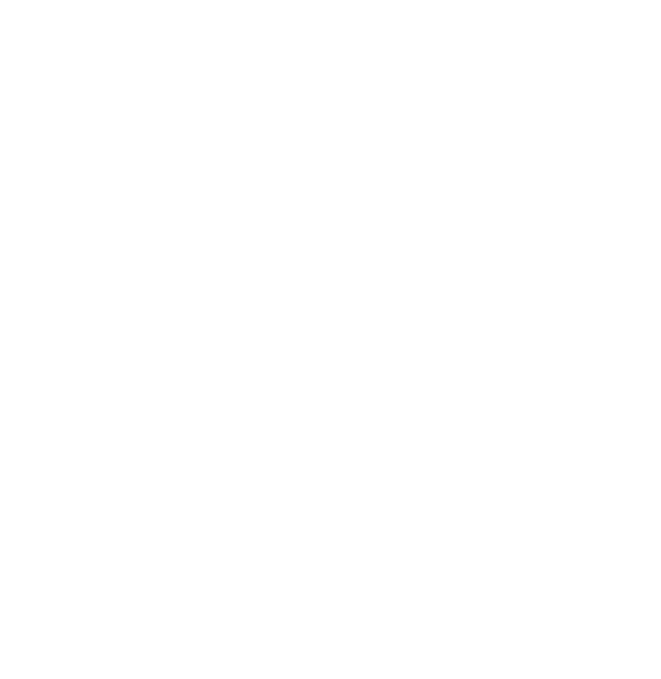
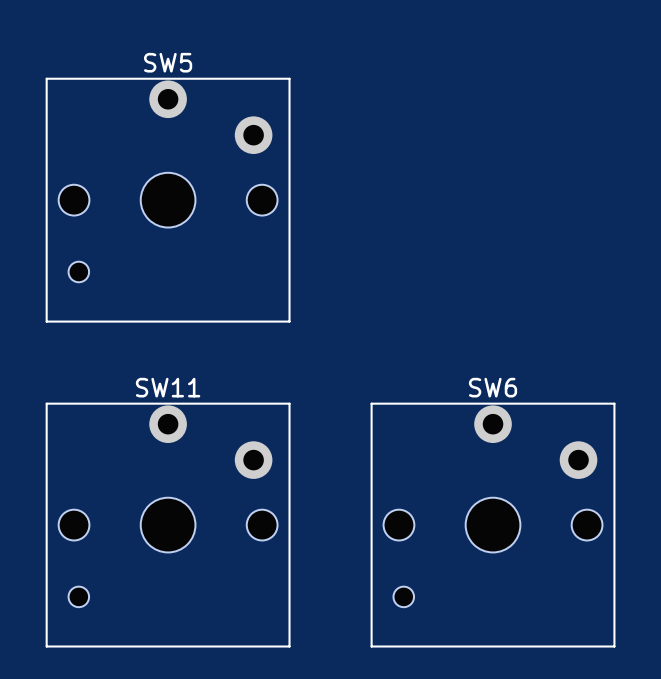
SW5: none -> (168, 200)
SW11: none -> (168, 525)
SW6: none -> (493, 525)

